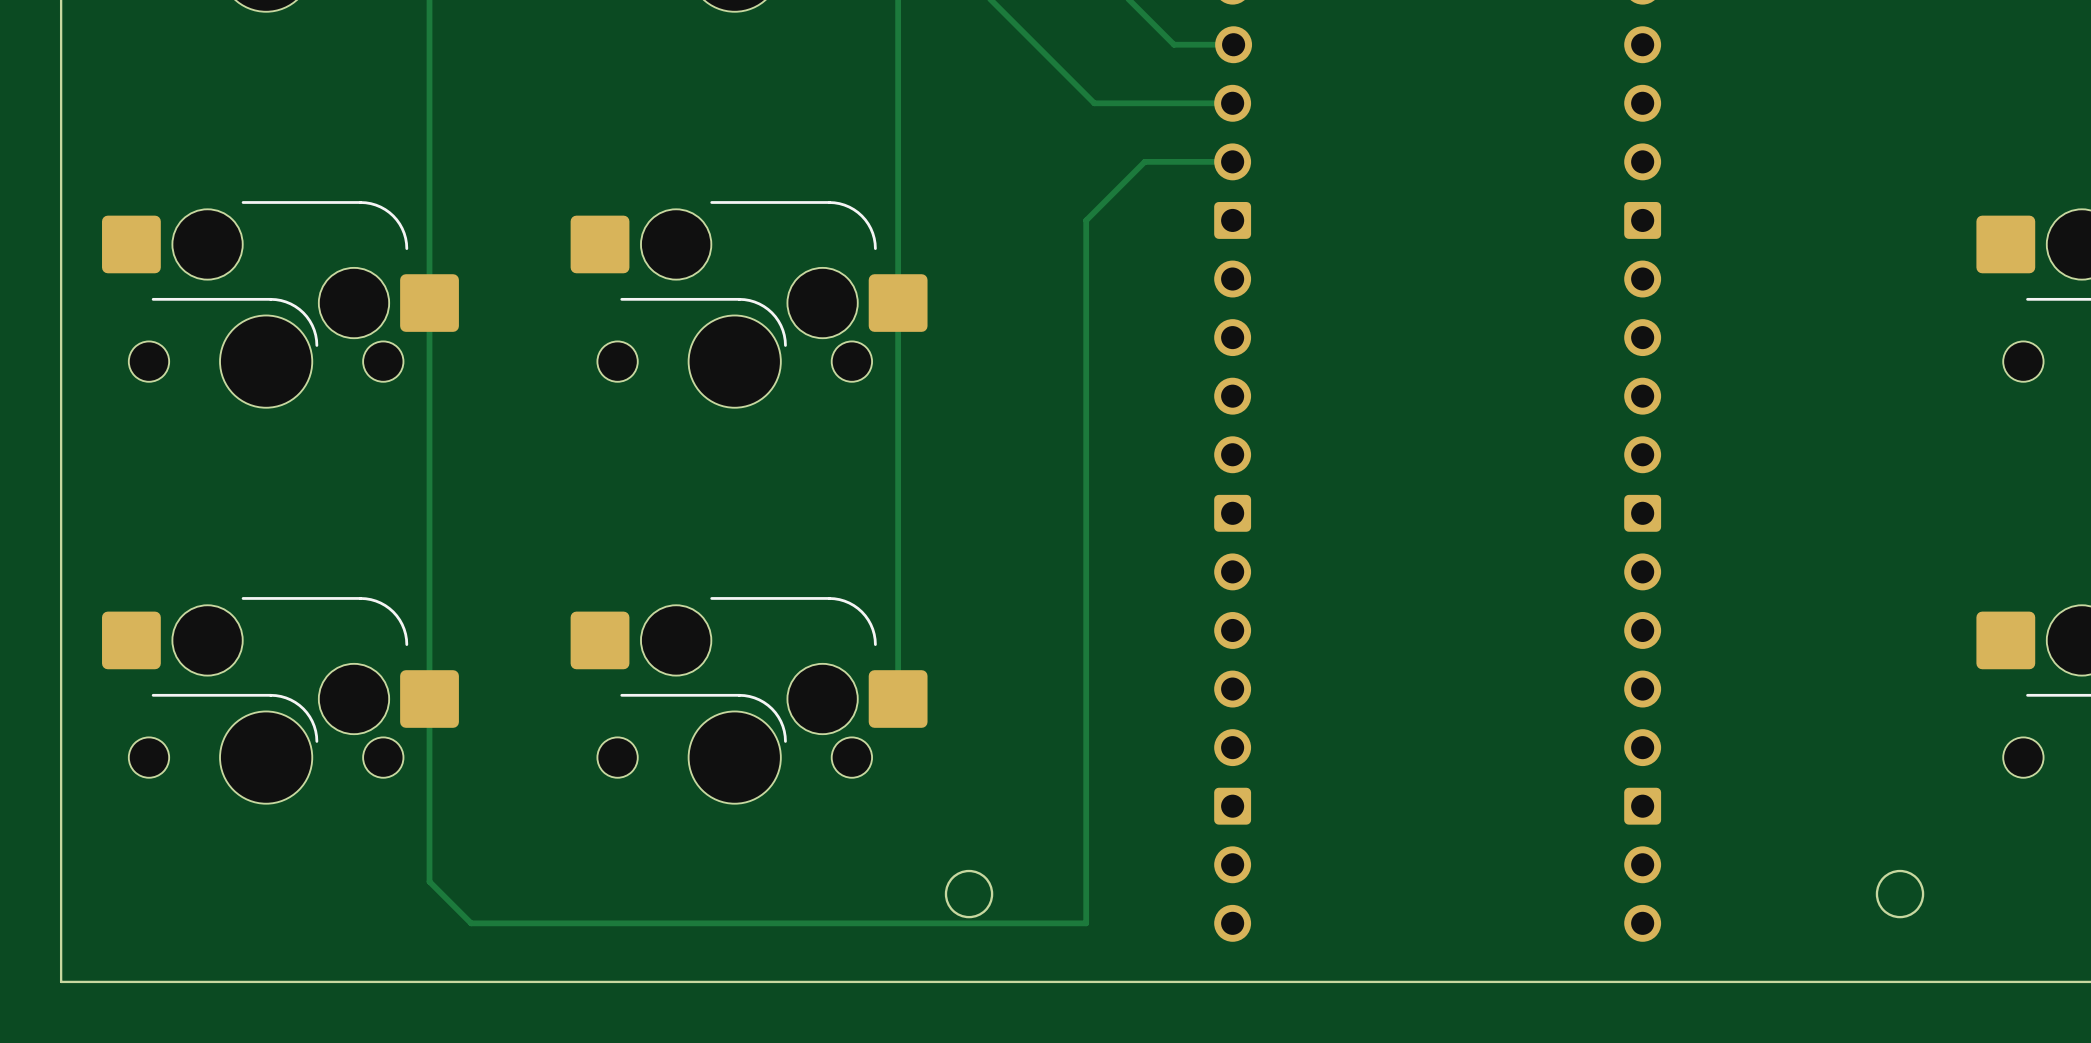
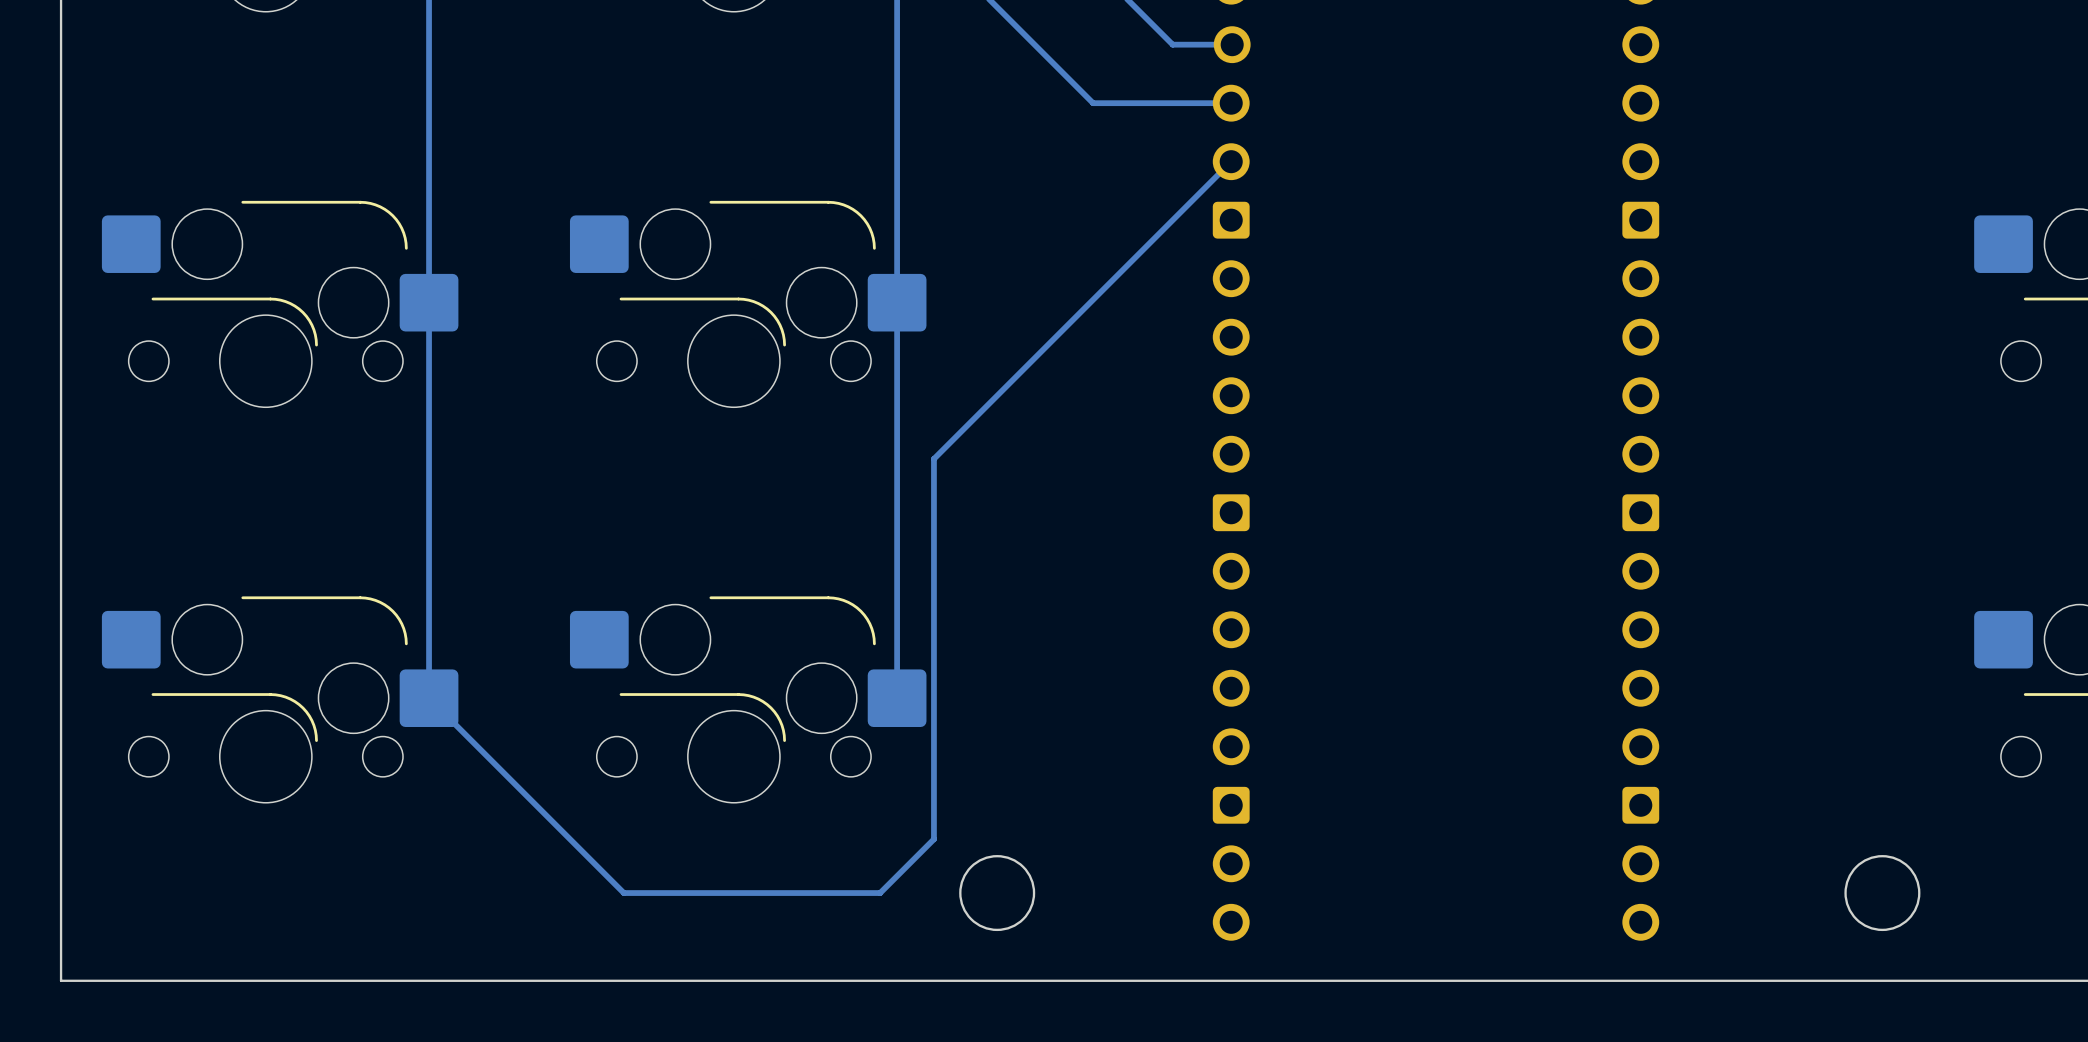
track: (1232, 161) (1144, 161) (1086, 220) (1086, 923) (471, 923) (429, 881) (429, 699) -> (1231, 161) (933, 458) (933, 839) (880, 893) (623, 893) (429, 698)
round board edge: none -> [959, 855, 1036, 932]
round board edge: [944, 869, 994, 919] -> none
round board edge size: [1875, 869, 1925, 919] -> [1844, 855, 1921, 932]

